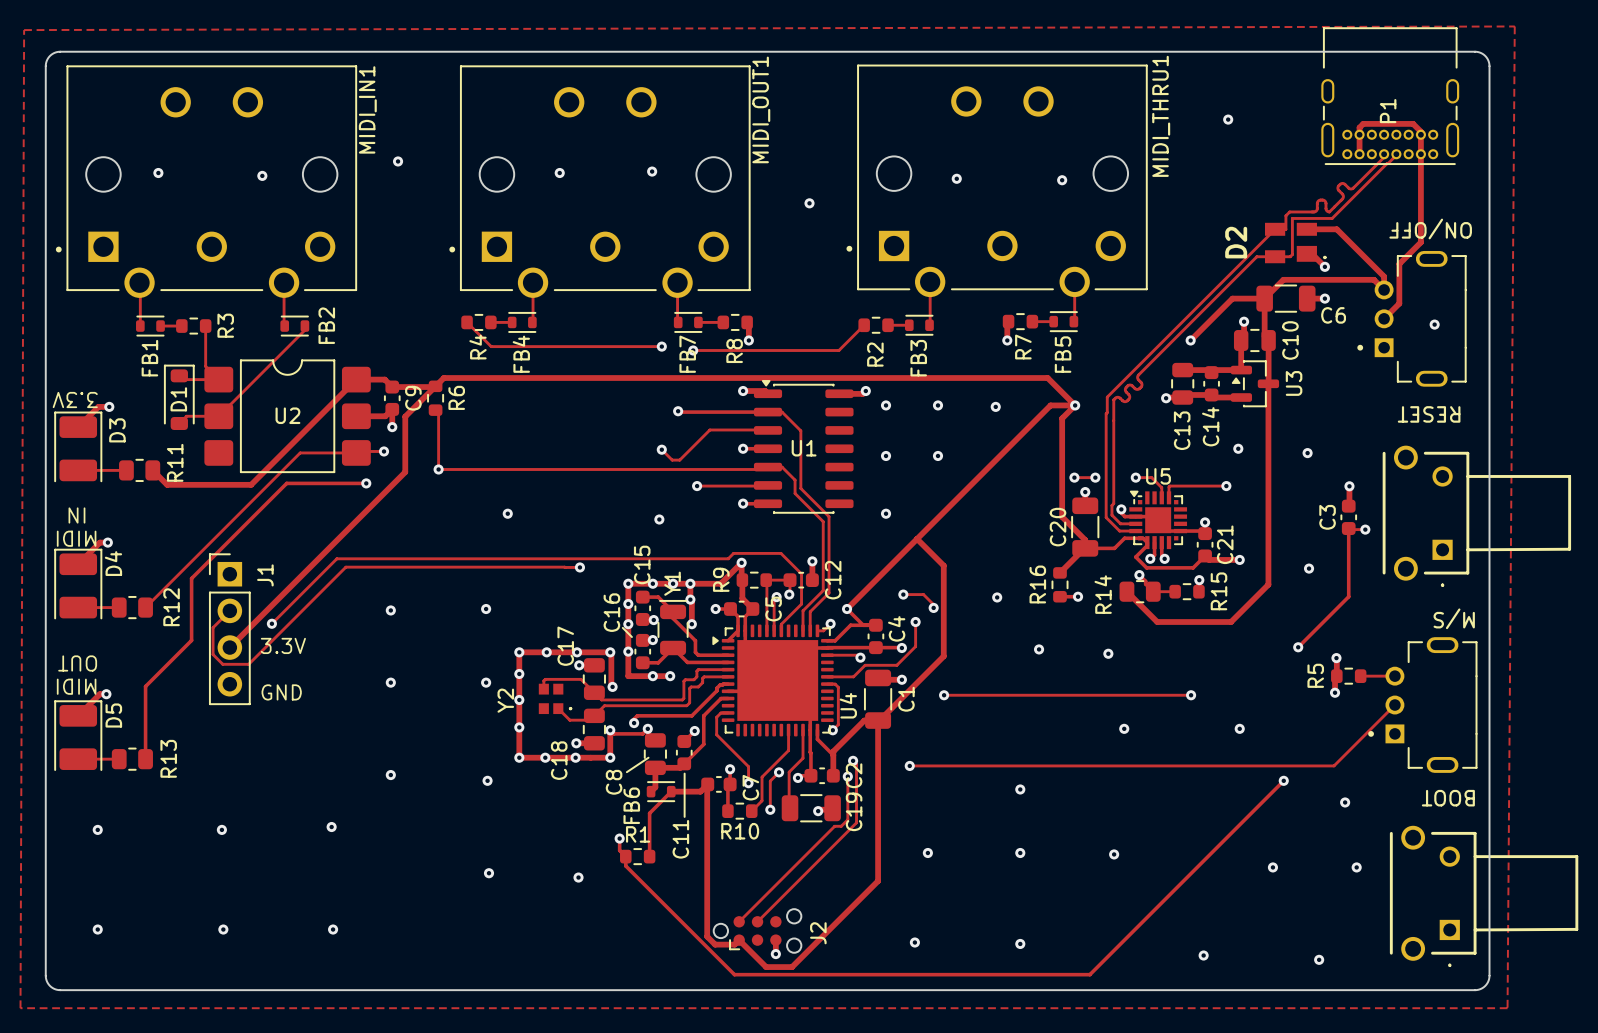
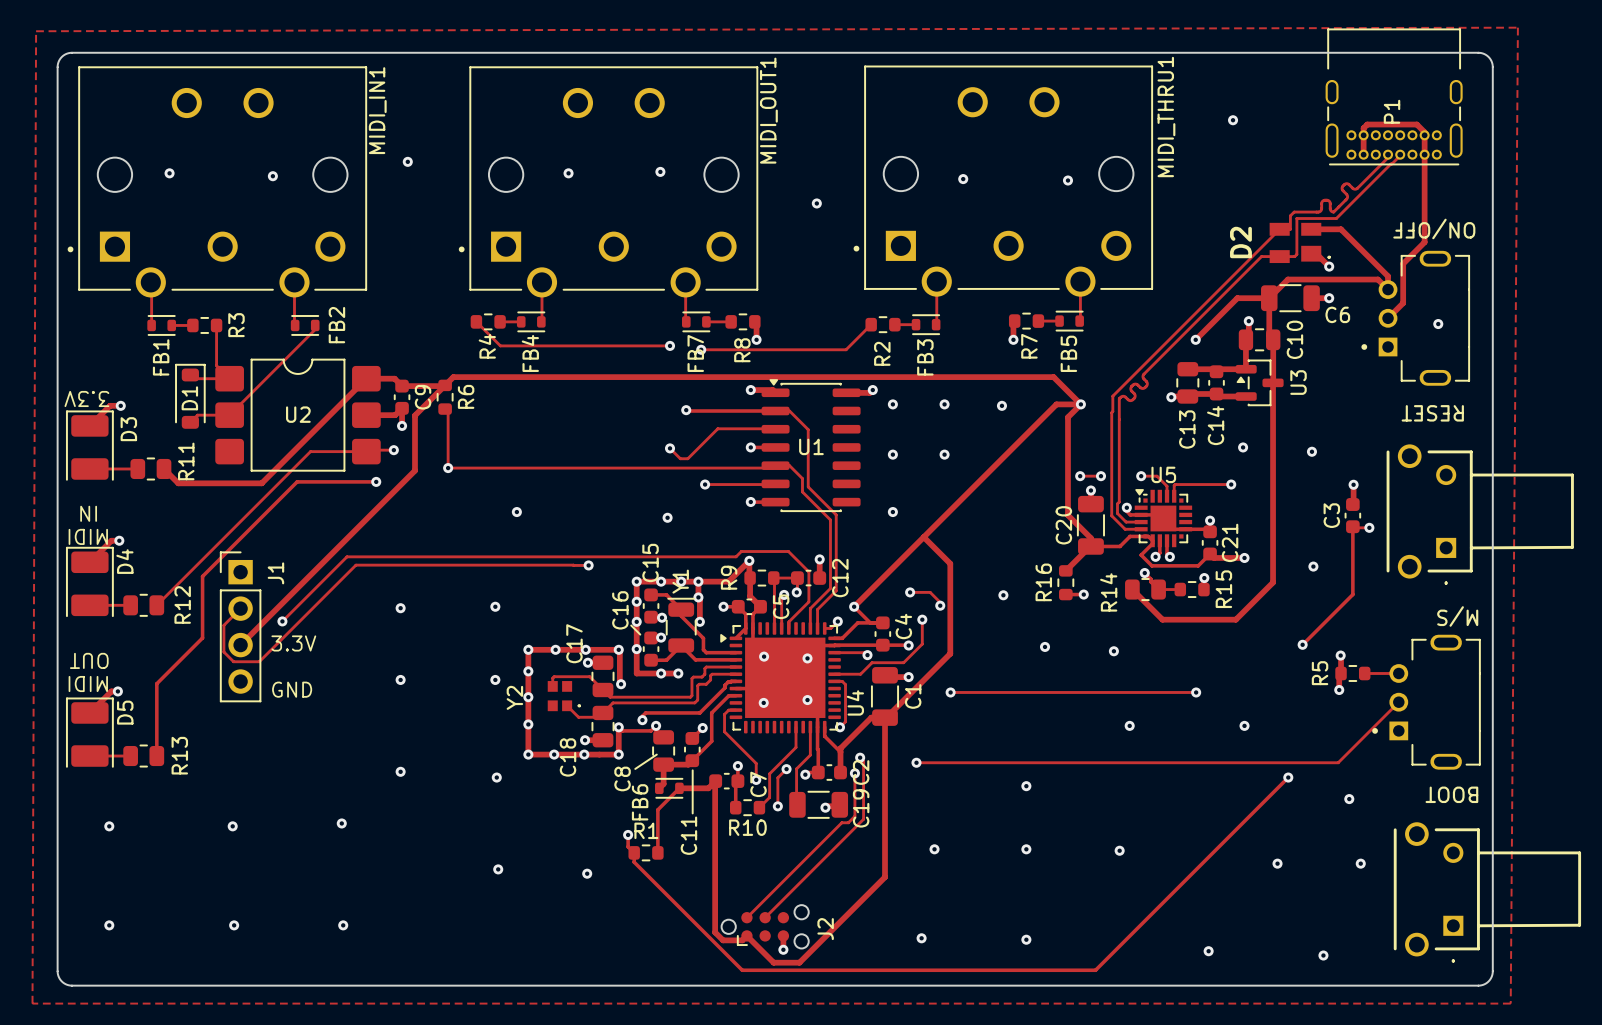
via: none -> (764, 656)
via: none -> (807, 658)
via: none -> (807, 700)
via: none -> (763, 702)

